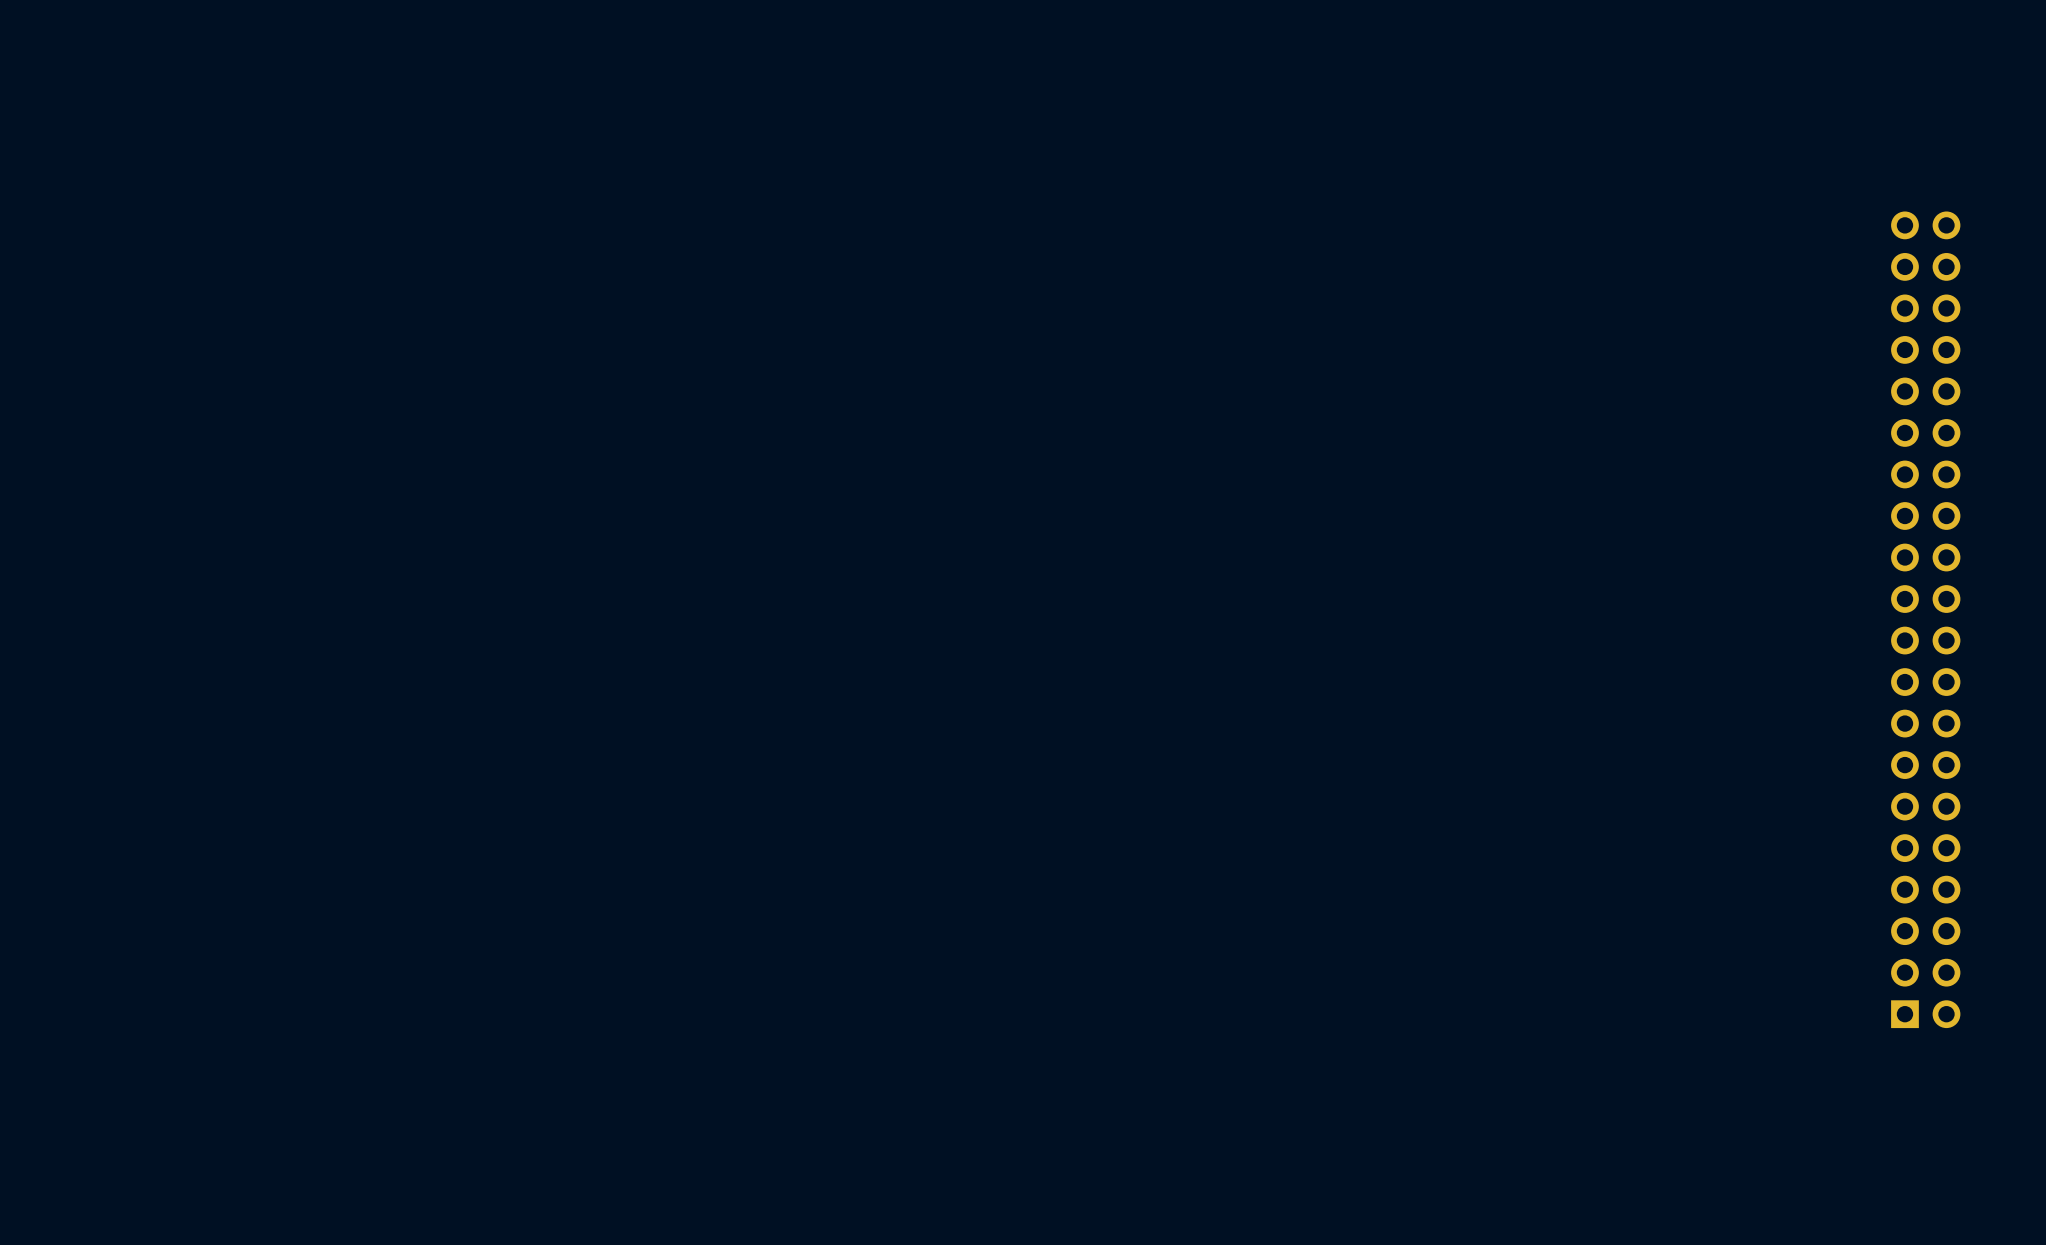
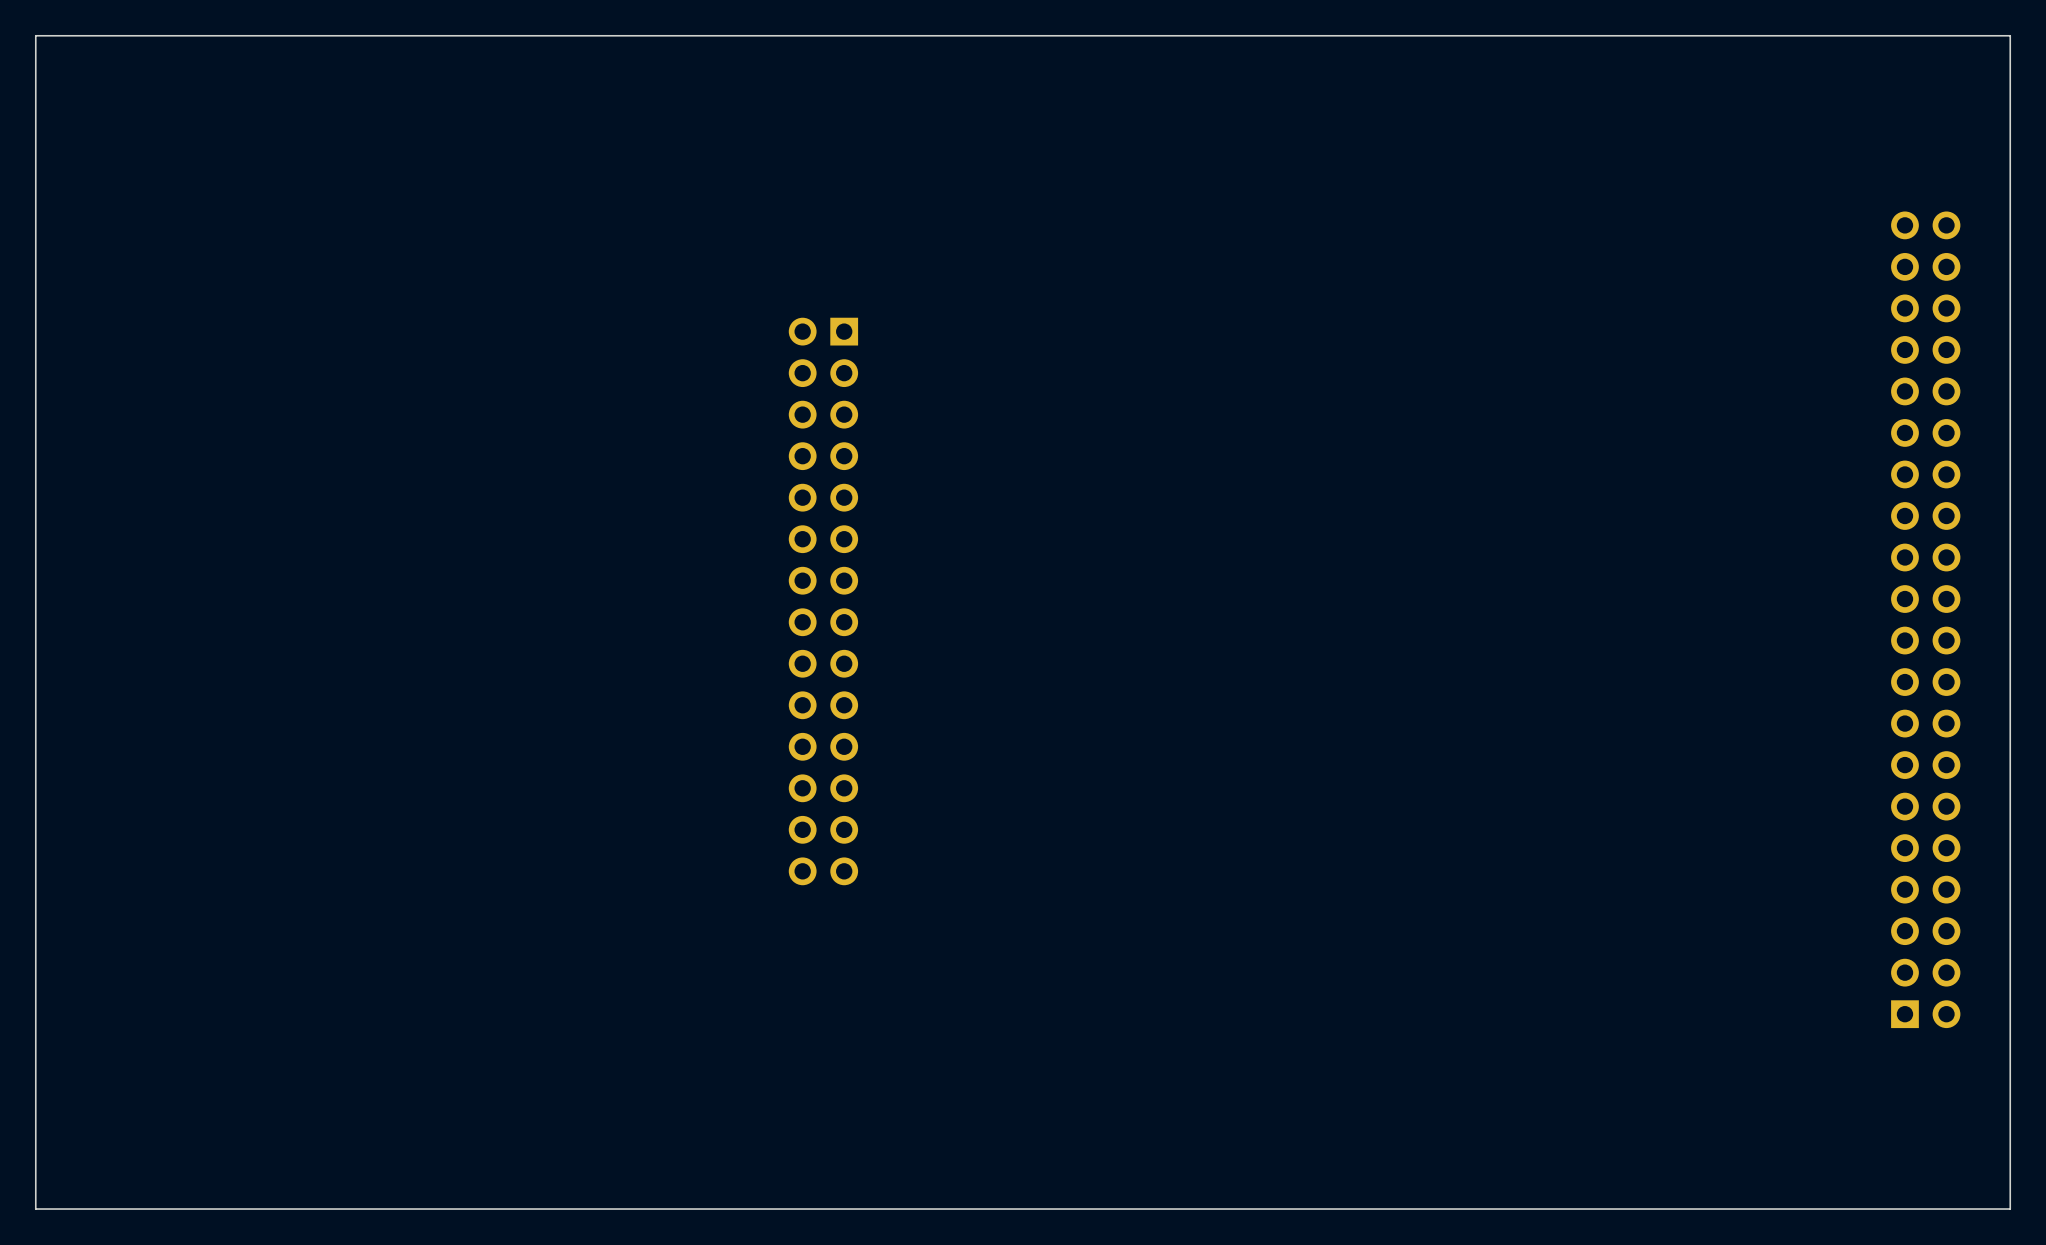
board edge: none -> (2010, 35) (35, 35) (35, 1209) (2010, 1209) (2010, 35)
part: none -> (823, 601)

